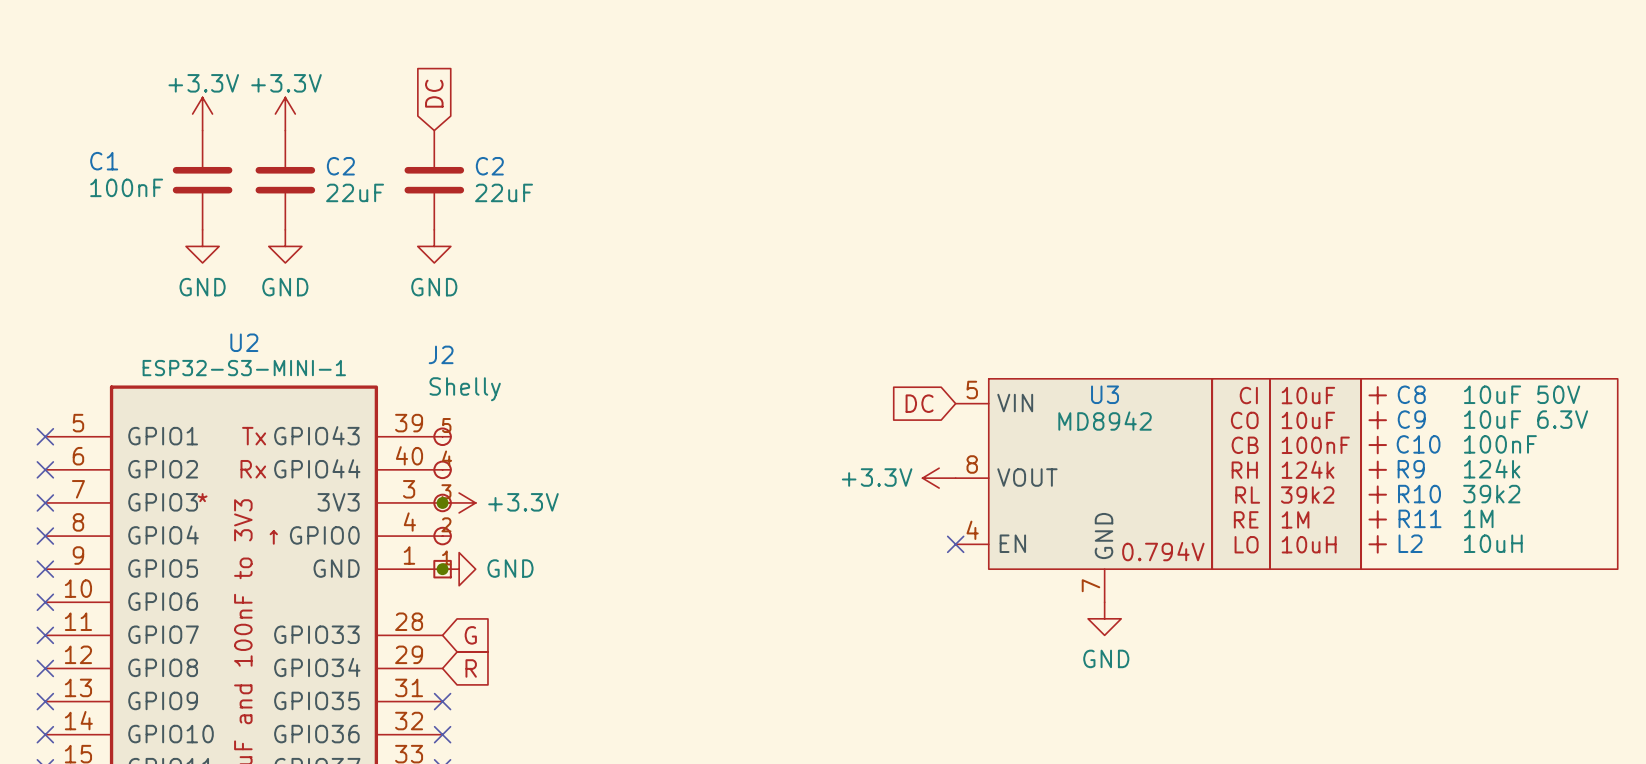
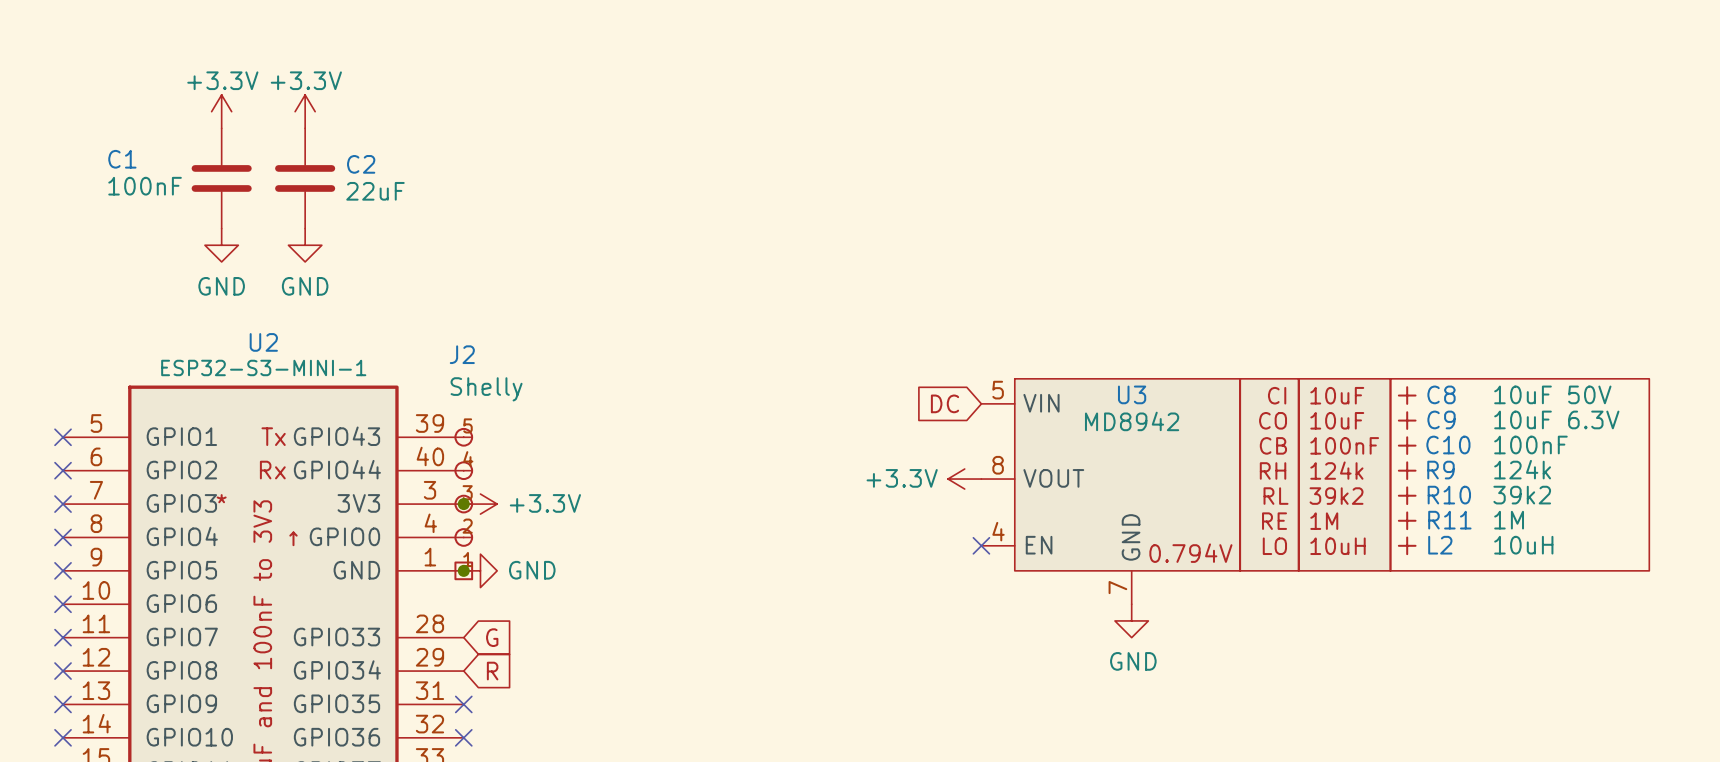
global label: DC (434, 93) -> none
C2: 22uF (434, 180) -> none
power symbol: GND (434, 246) -> none

